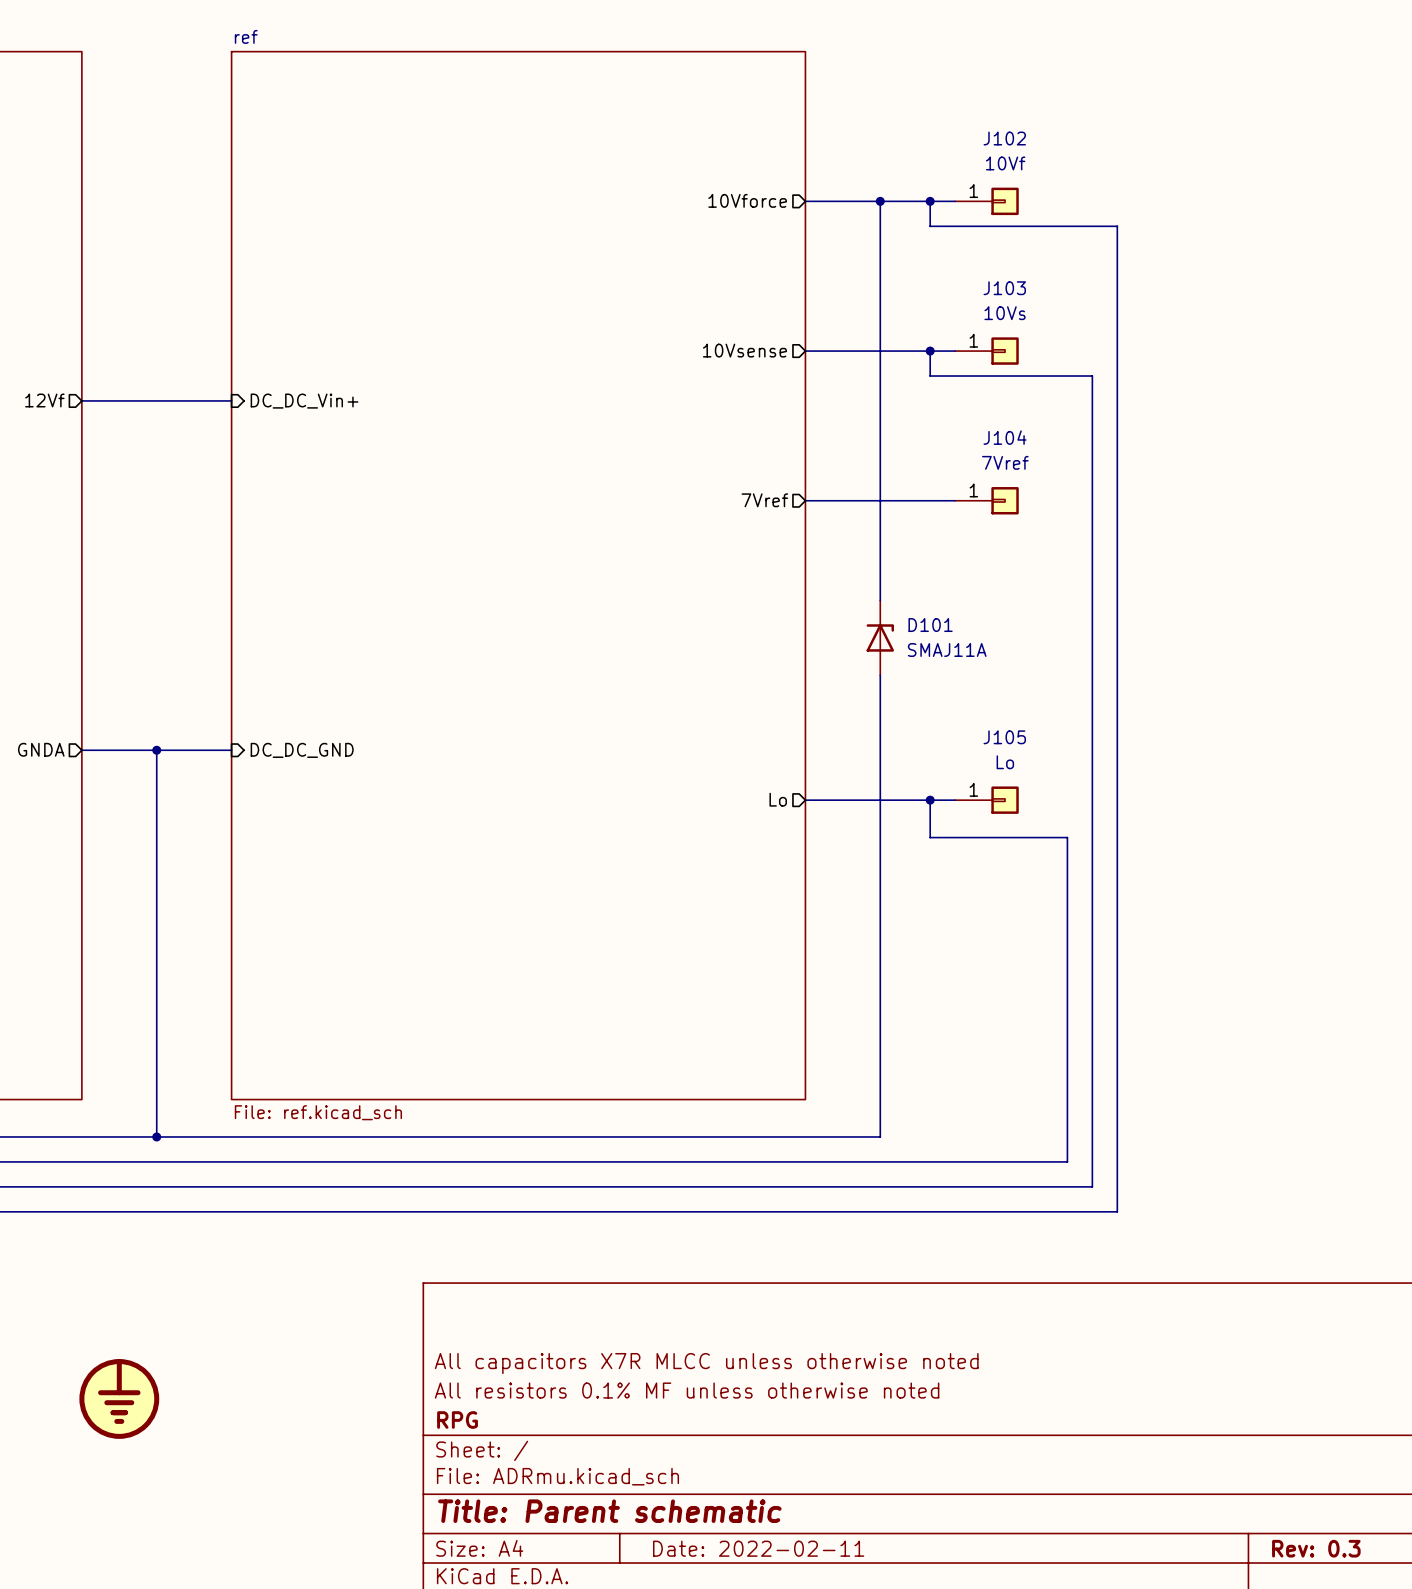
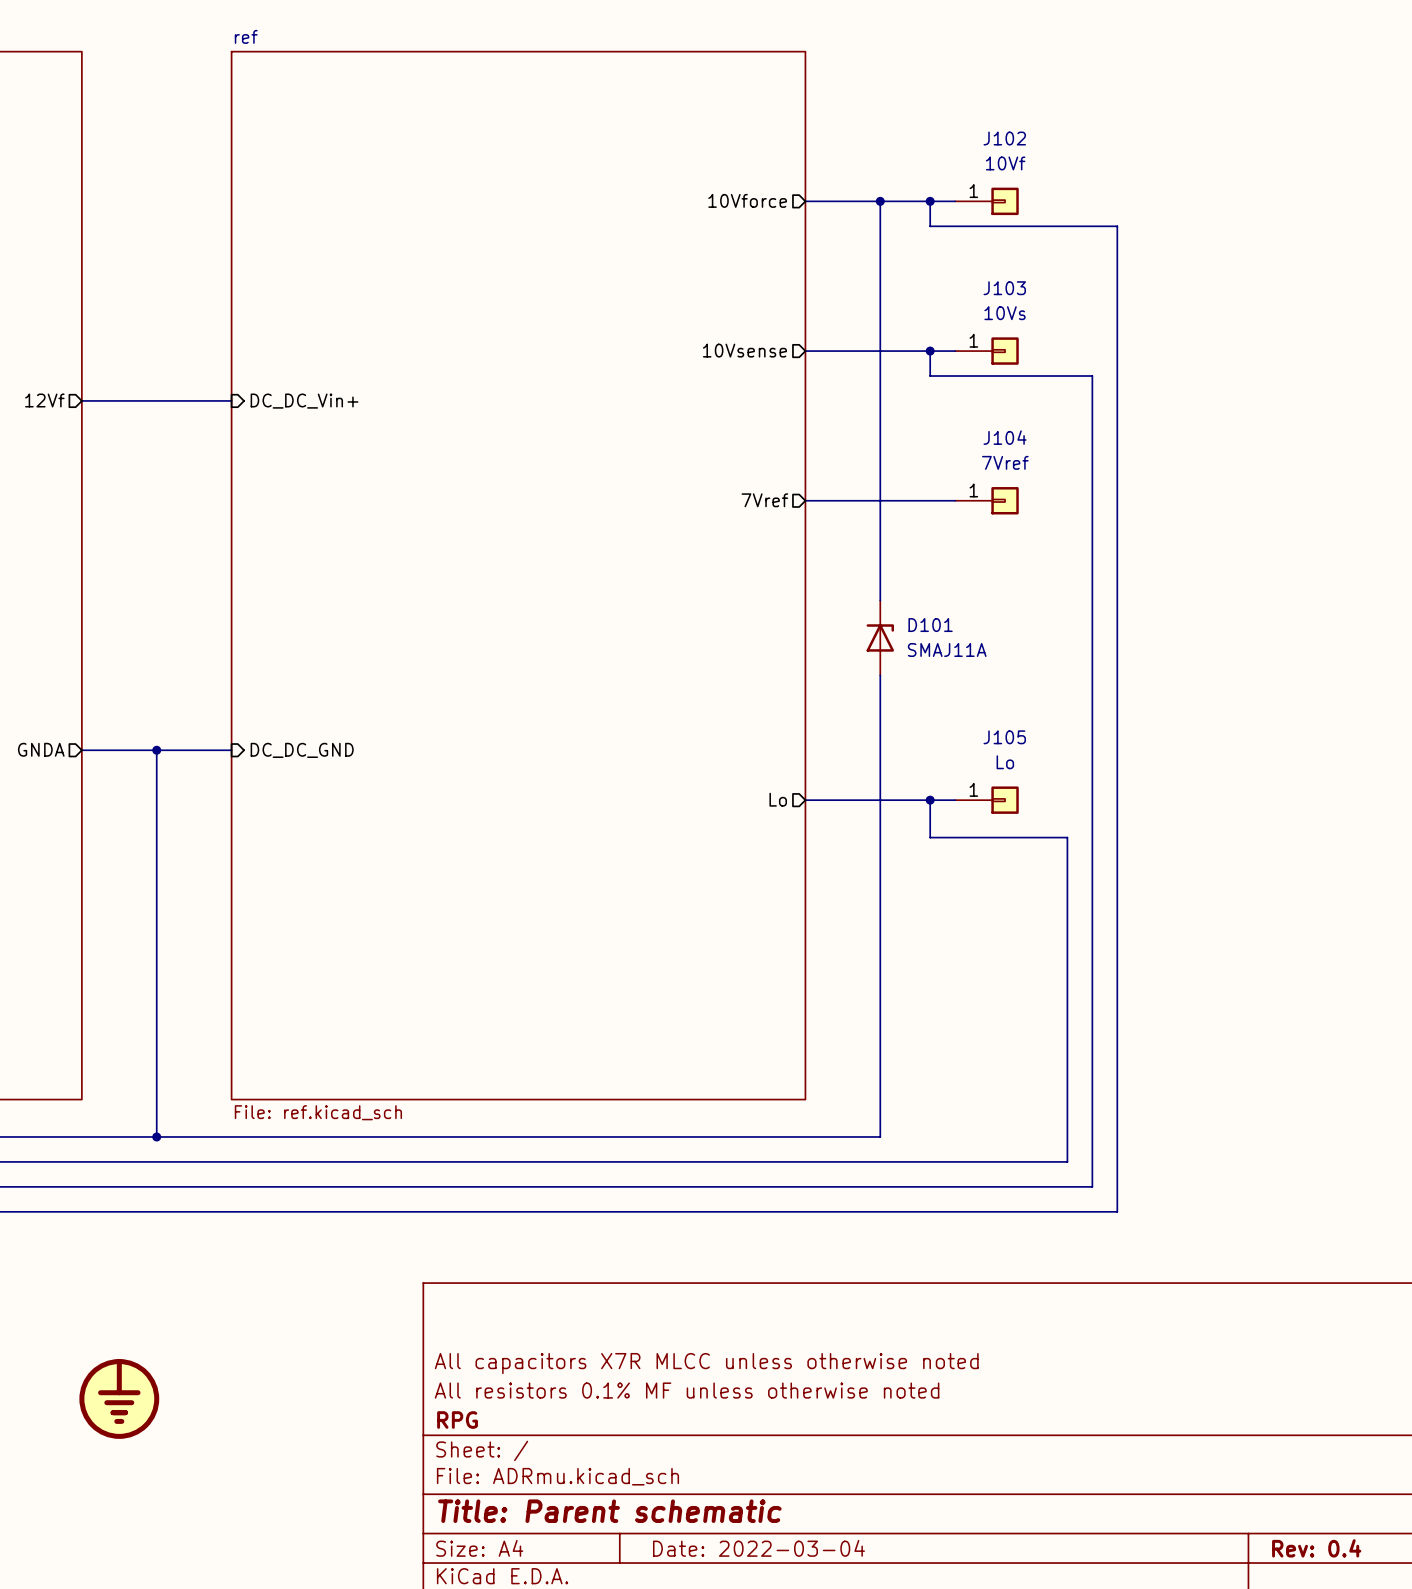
title block: Date: 2022-02-11 (758, 1548) -> Date: 2022-03-04 (758, 1548)
title block: Rev: 0.3 (1316, 1548) -> Rev: 0.4 (1316, 1548)

